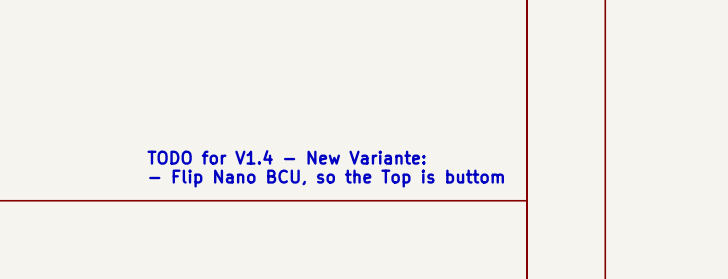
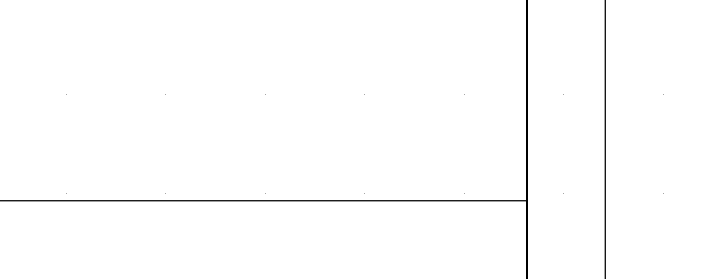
text: TODO for V1.4 - New Variante: (286, 157) -> none
text: - Flip Nano BCU, so the Top is buttom (326, 178) -> none

